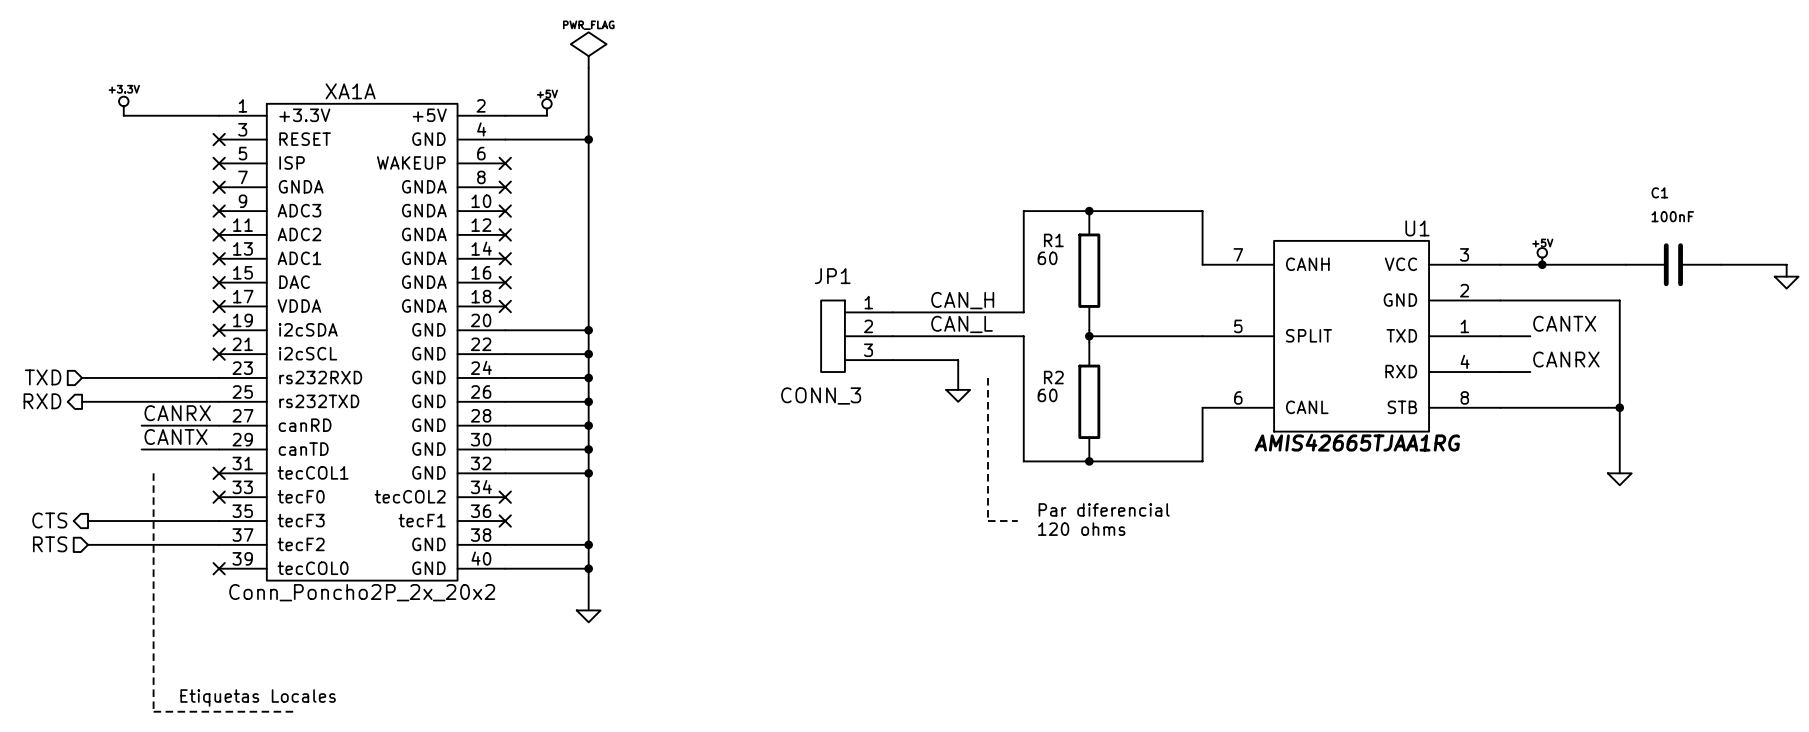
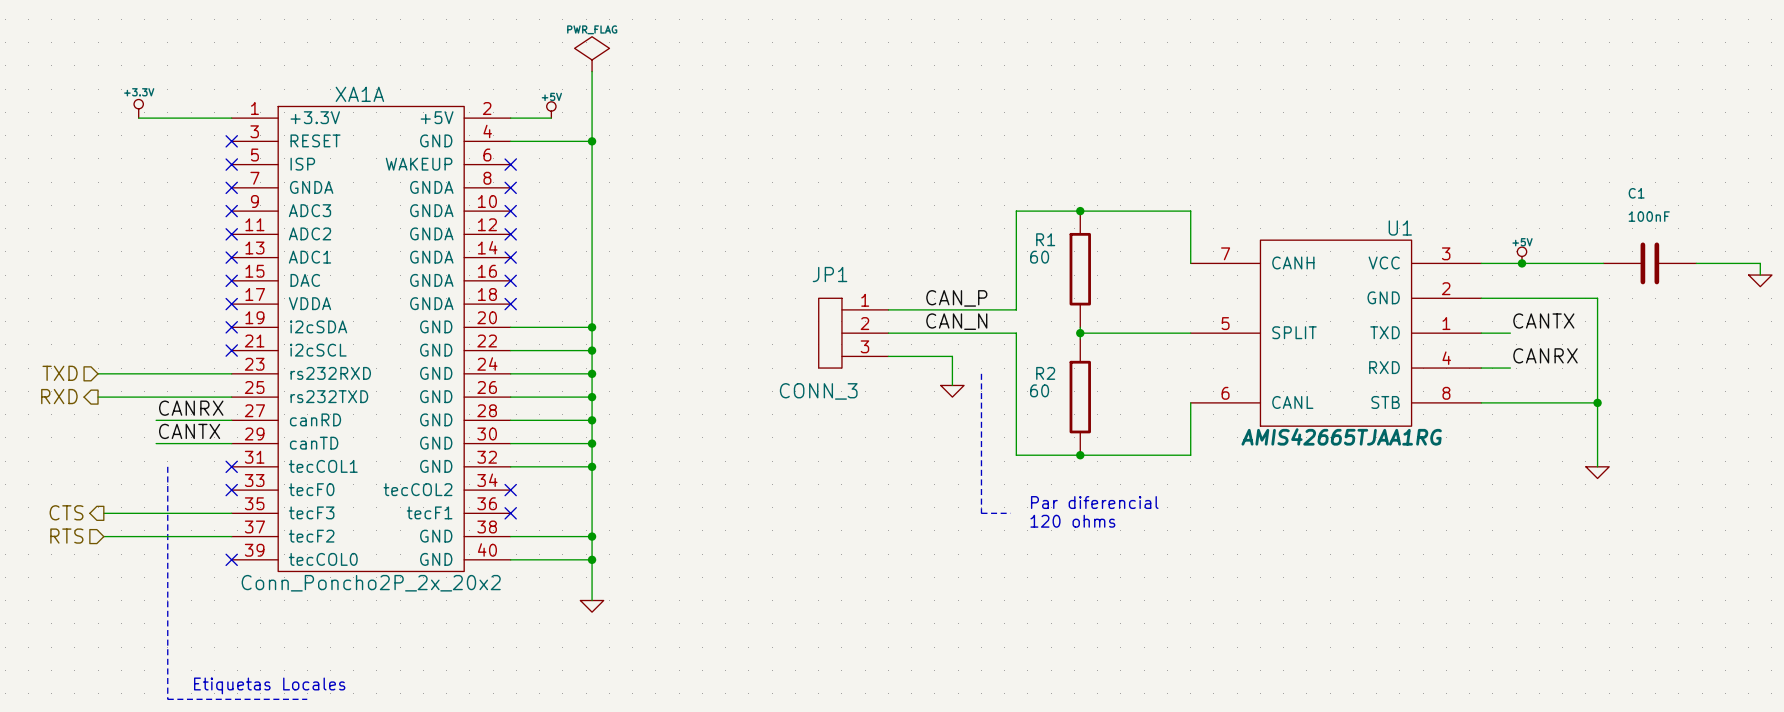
label: CAN_H (962, 300) -> CAN_P (956, 298)
label: CAN_L (962, 324) -> CAN_N (956, 321)

